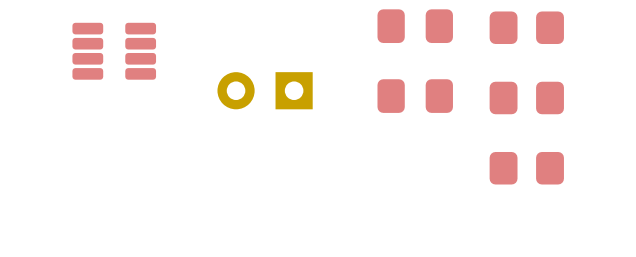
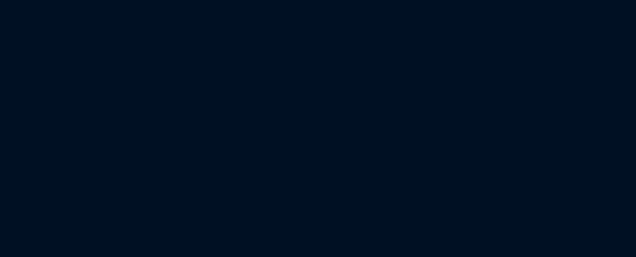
part: (415, 26) -> none
part: (526, 27) -> none
part: (114, 51) -> none
part: (265, 90) -> none
part: (415, 96) -> none
part: (526, 97) -> none
part: (526, 168) -> none

